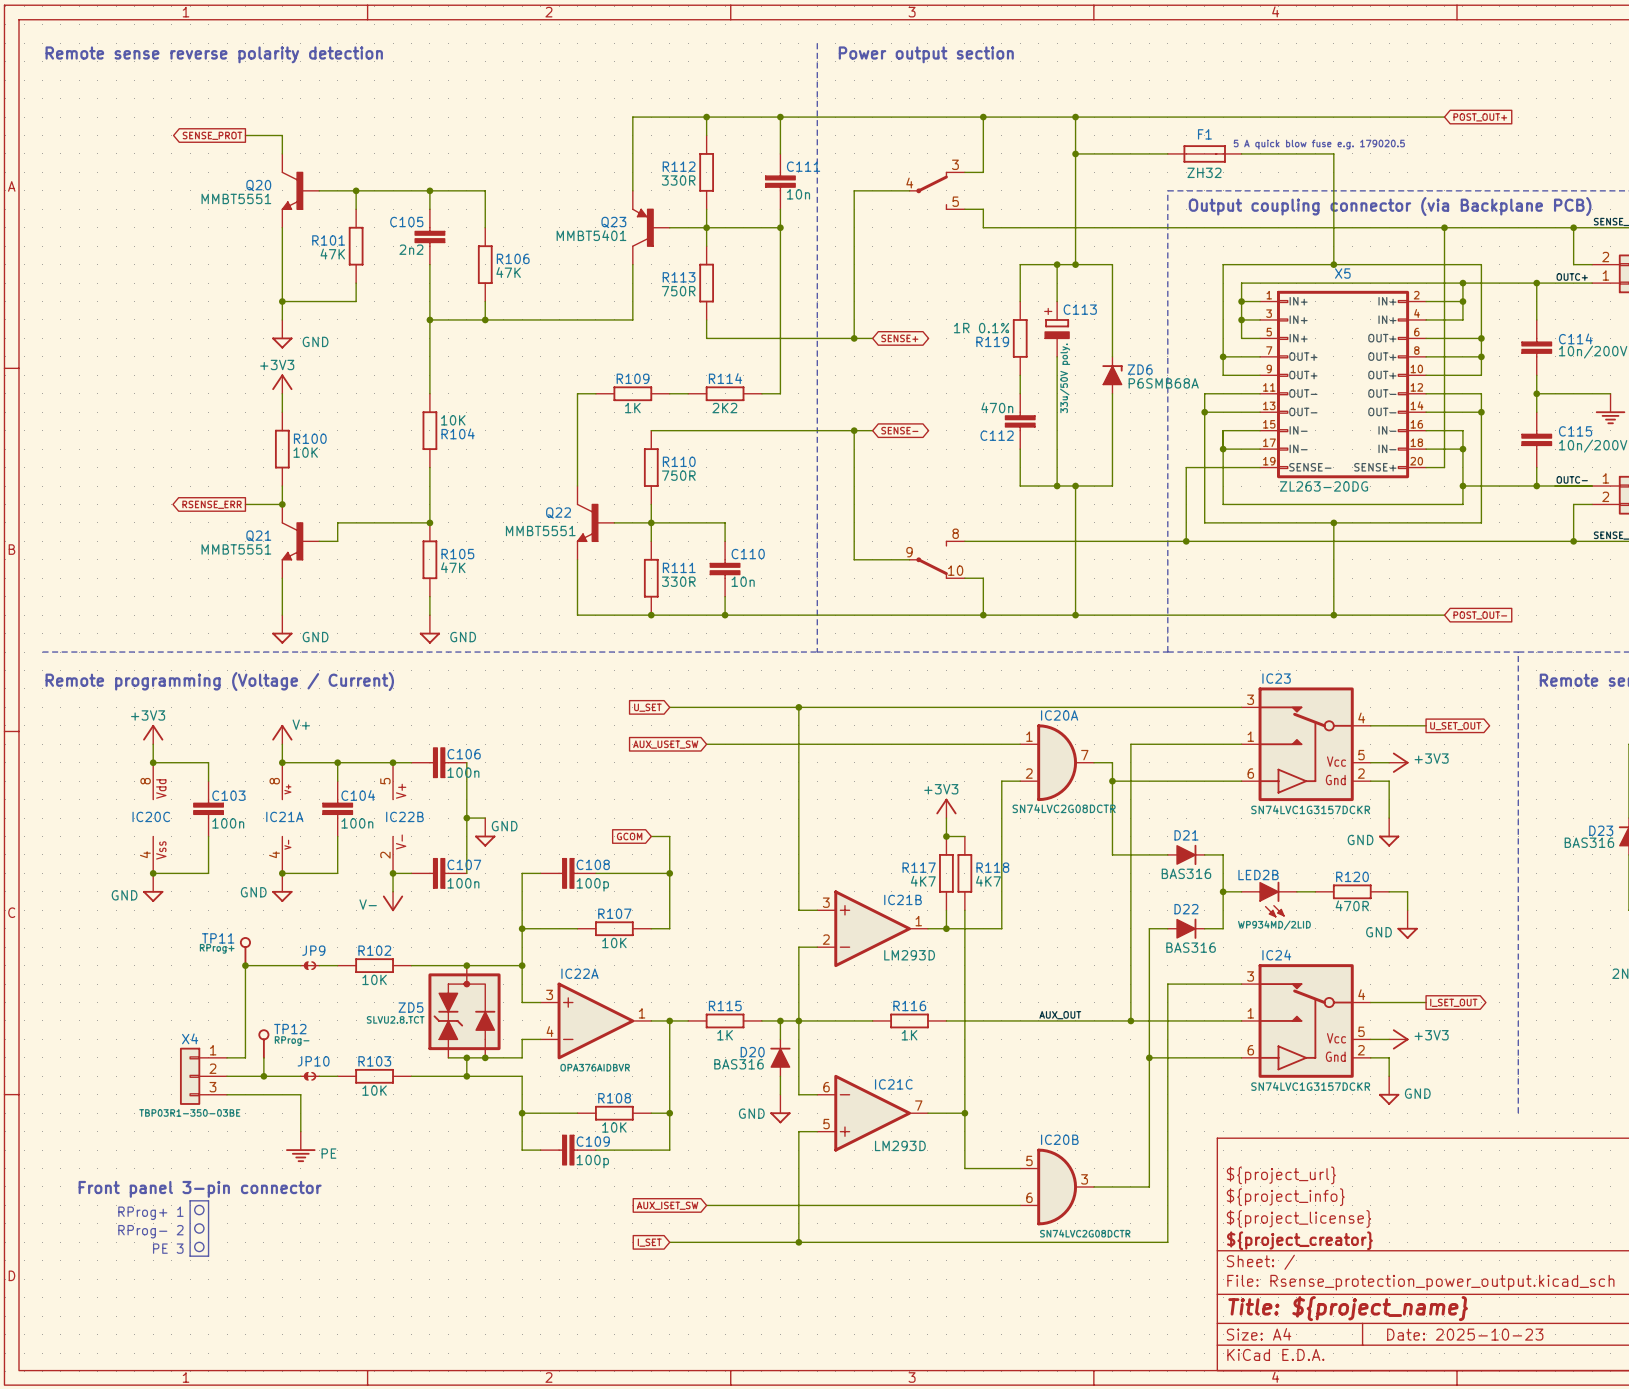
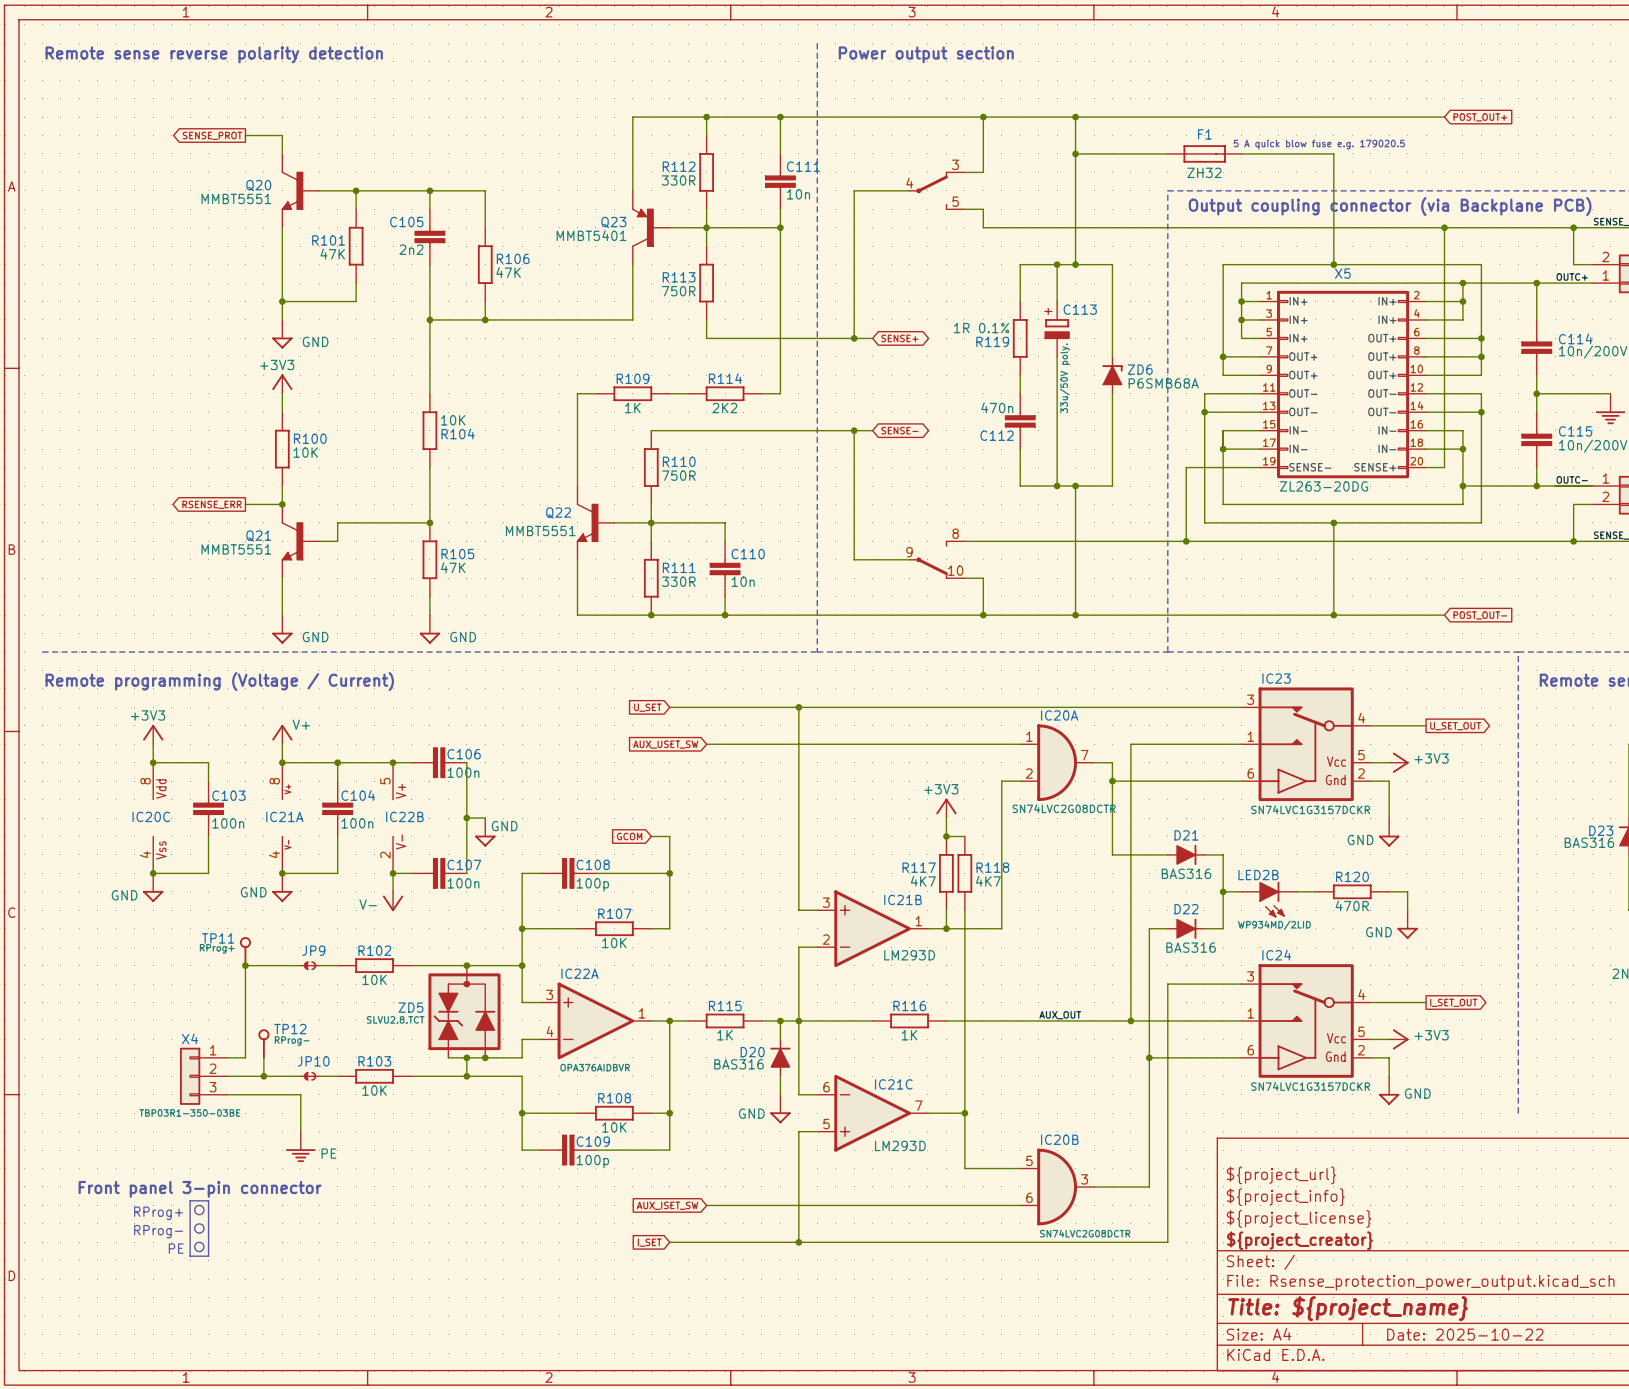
text: RProg+ 1 (150, 1213) -> RProg+ (158, 1213)
text: RProg- 2 (150, 1231) -> RProg- (158, 1231)
text: PE 3 (168, 1248) -> PE (176, 1248)
title block: Date: 2025-10-23 (1465, 1334) -> Date: 2025-10-22 (1465, 1334)

